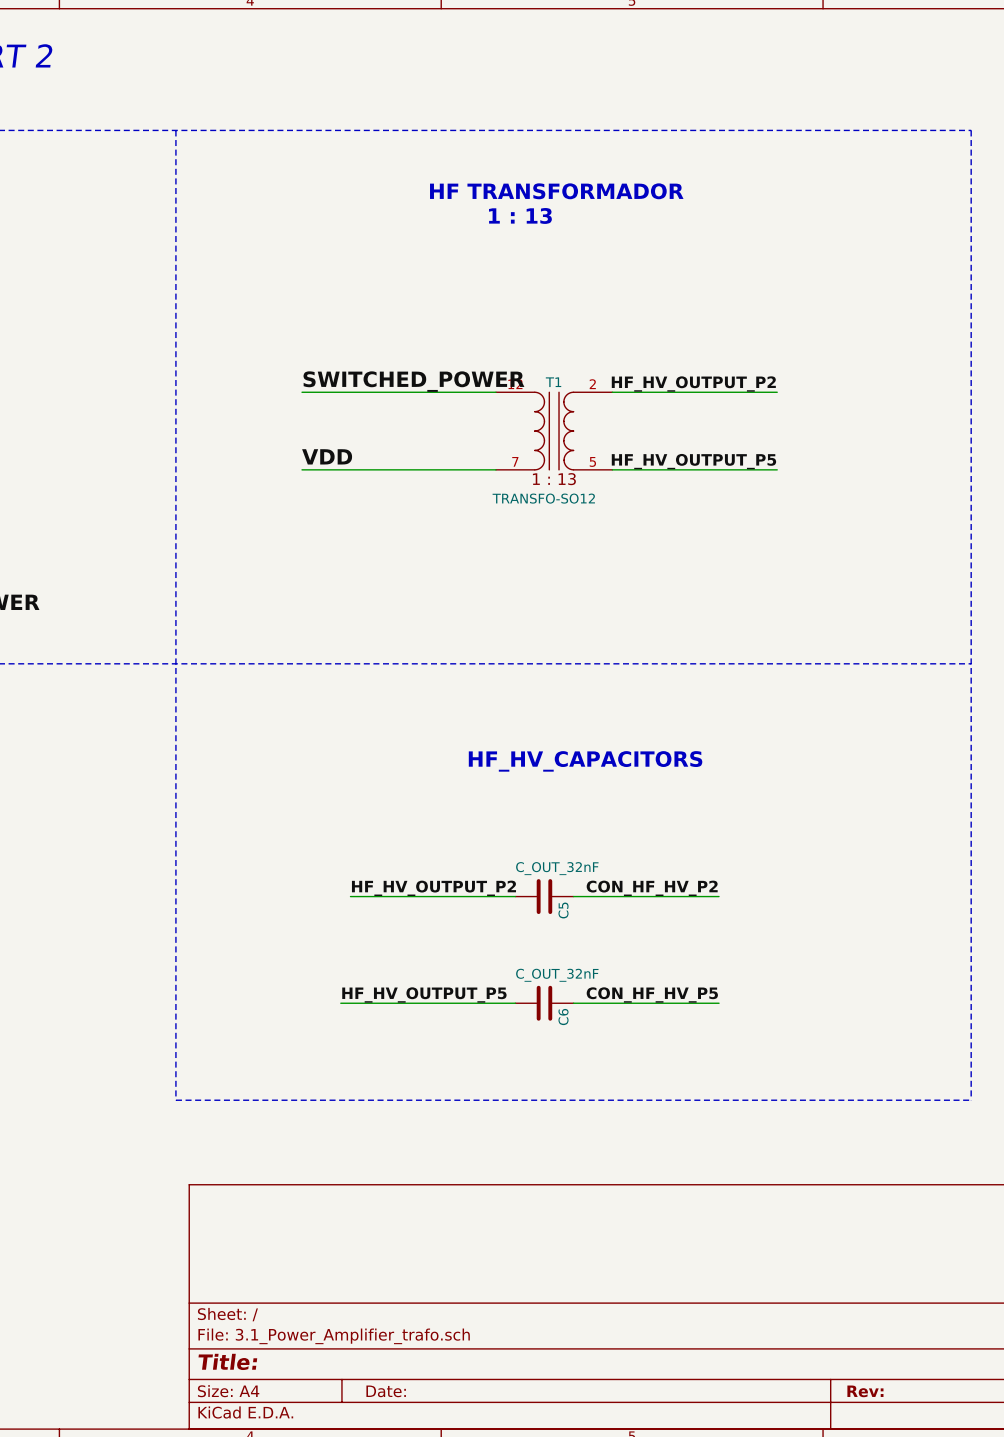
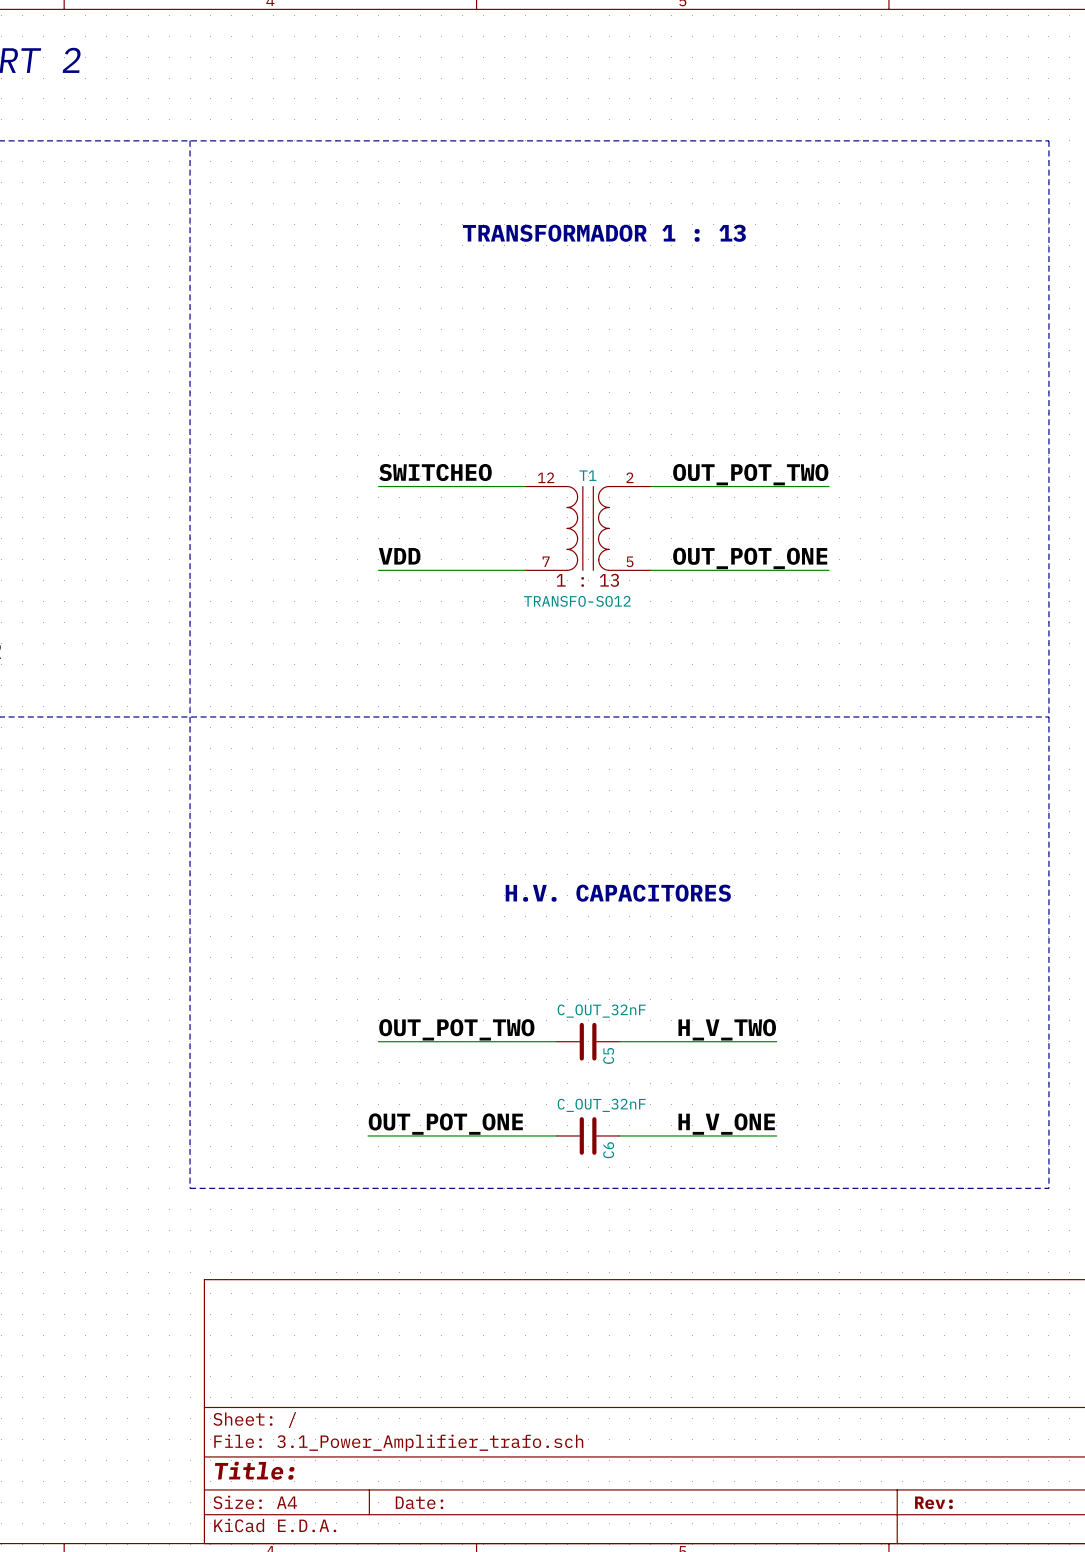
text: HF TRANSFORMADOR (556, 191) -> none
text: 1 : 13 (520, 215) -> TRANSFORMADOR 1 : 13 (604, 233)
label: SWITCHED_POWER (413, 381) -> none
label: HF_HV_OUTPUT_P2 (693, 384) -> none
wire: (302, 392) (495, 392) -> none
wire: (612, 392) (777, 392) -> (650, 486) (829, 486)
T1 position: (554, 431) -> (588, 528)
label: none -> SWITCHEO (435, 472)
label: none -> OUT_POT_TWO (750, 474)
wire: none -> (378, 486) (525, 486)
label position: VDD (327, 456) -> VDD (399, 556)
label: HF_HV_OUTPUT_P5 (693, 461) -> none
wire: (302, 469) (495, 469) -> none
wire: (612, 469) (777, 469) -> (650, 570) (829, 570)
label: none -> OUT_POT_ONE (750, 558)
wire: none -> (378, 570) (525, 570)
text: HF_HV_CAPACITORS (585, 761) -> none
text: none -> H.V. CAPACITORES (618, 893)
label: HF_HV_OUTPUT_P2 (433, 888) -> none
label: CON_HF_HV_P2 (652, 888) -> none
wire: (350, 896) (515, 896) -> (378, 1041) (556, 1041)
C5 position: (544, 896) -> (588, 1041)
wire: (573, 896) (719, 896) -> (619, 1041) (776, 1041)
label: none -> OUT_POT_TWO (456, 1029)
label: none -> H_V_TWO (727, 1029)
label: HF_HV_OUTPUT_P5 (424, 994) -> none
label: CON_HF_HV_P5 (652, 994) -> none
wire: (340, 1003) (515, 1003) -> (368, 1135) (556, 1135)
C6 position: (544, 1003) -> (588, 1135)
wire: (573, 1003) (719, 1003) -> (619, 1135) (776, 1135)
label: none -> OUT_POT_ONE (445, 1124)
label: none -> H_V_ONE (726, 1124)

